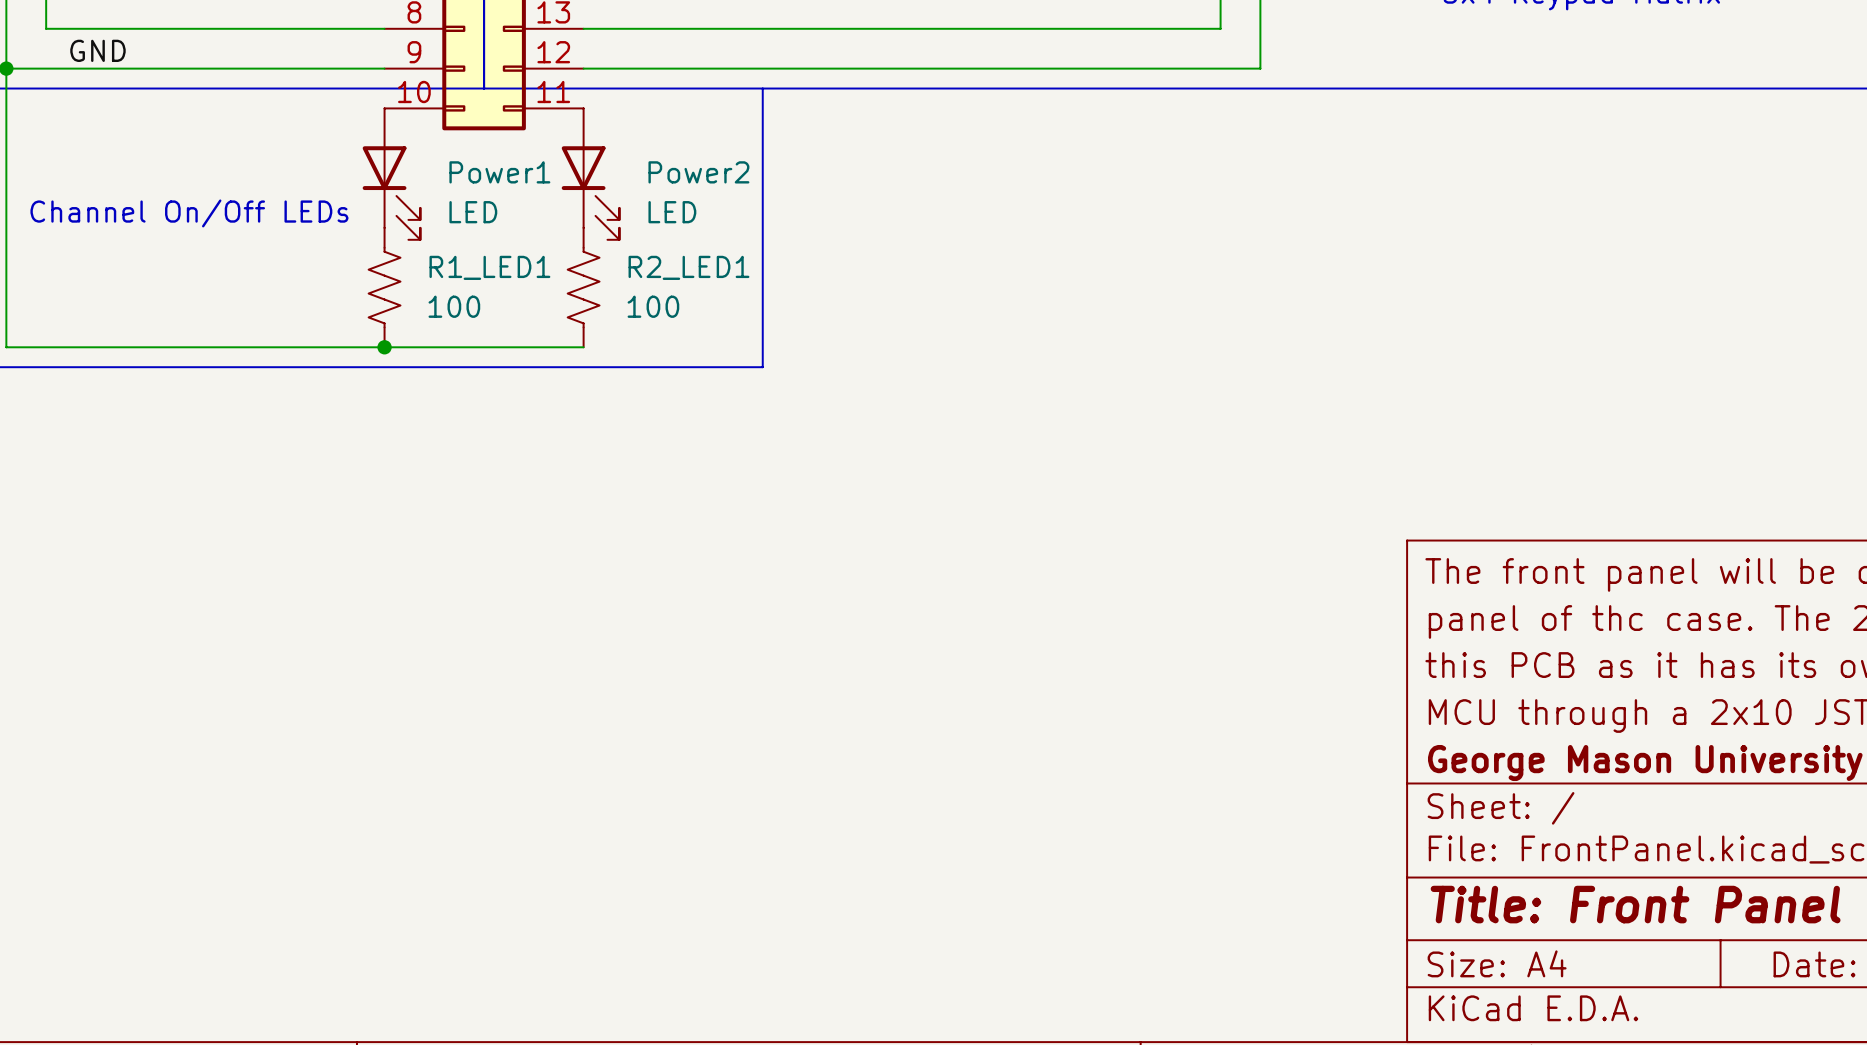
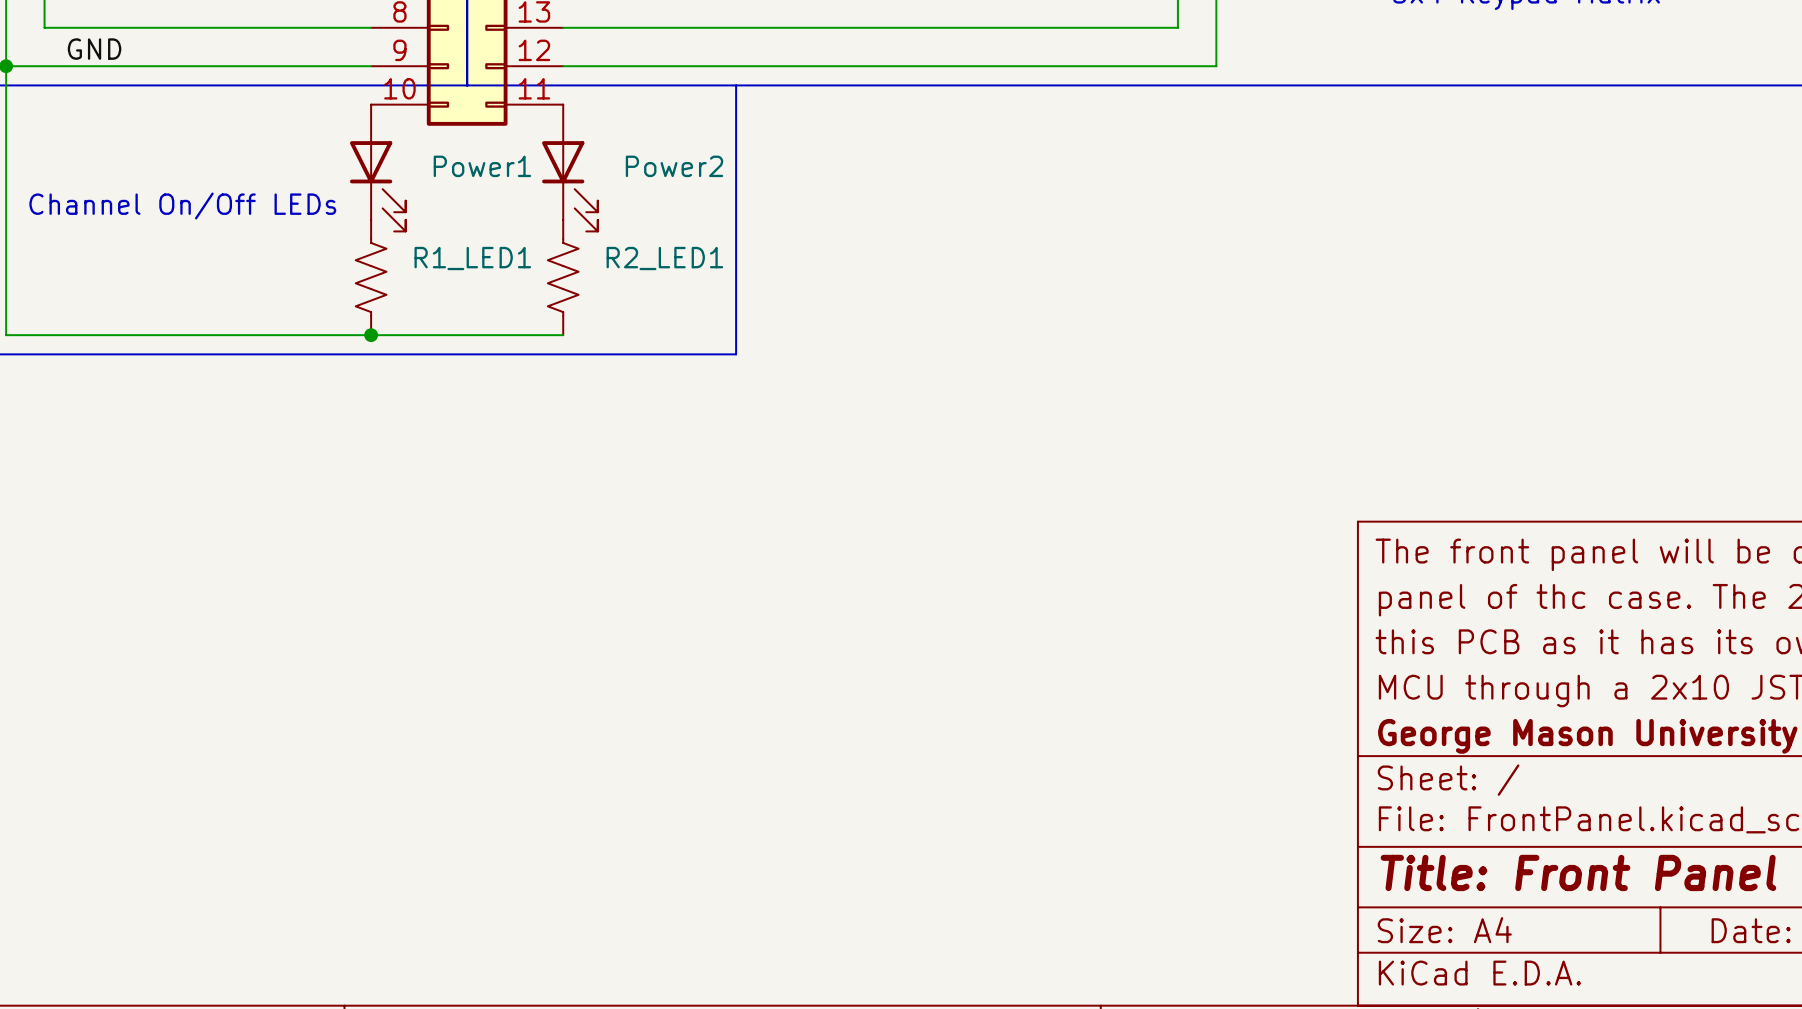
Power1 value: LED (473, 212) -> none
Power2 value: LED (672, 212) -> none
R1_LED1 value: 100 (454, 306) -> none
R2_LED1 value: 100 (653, 306) -> none

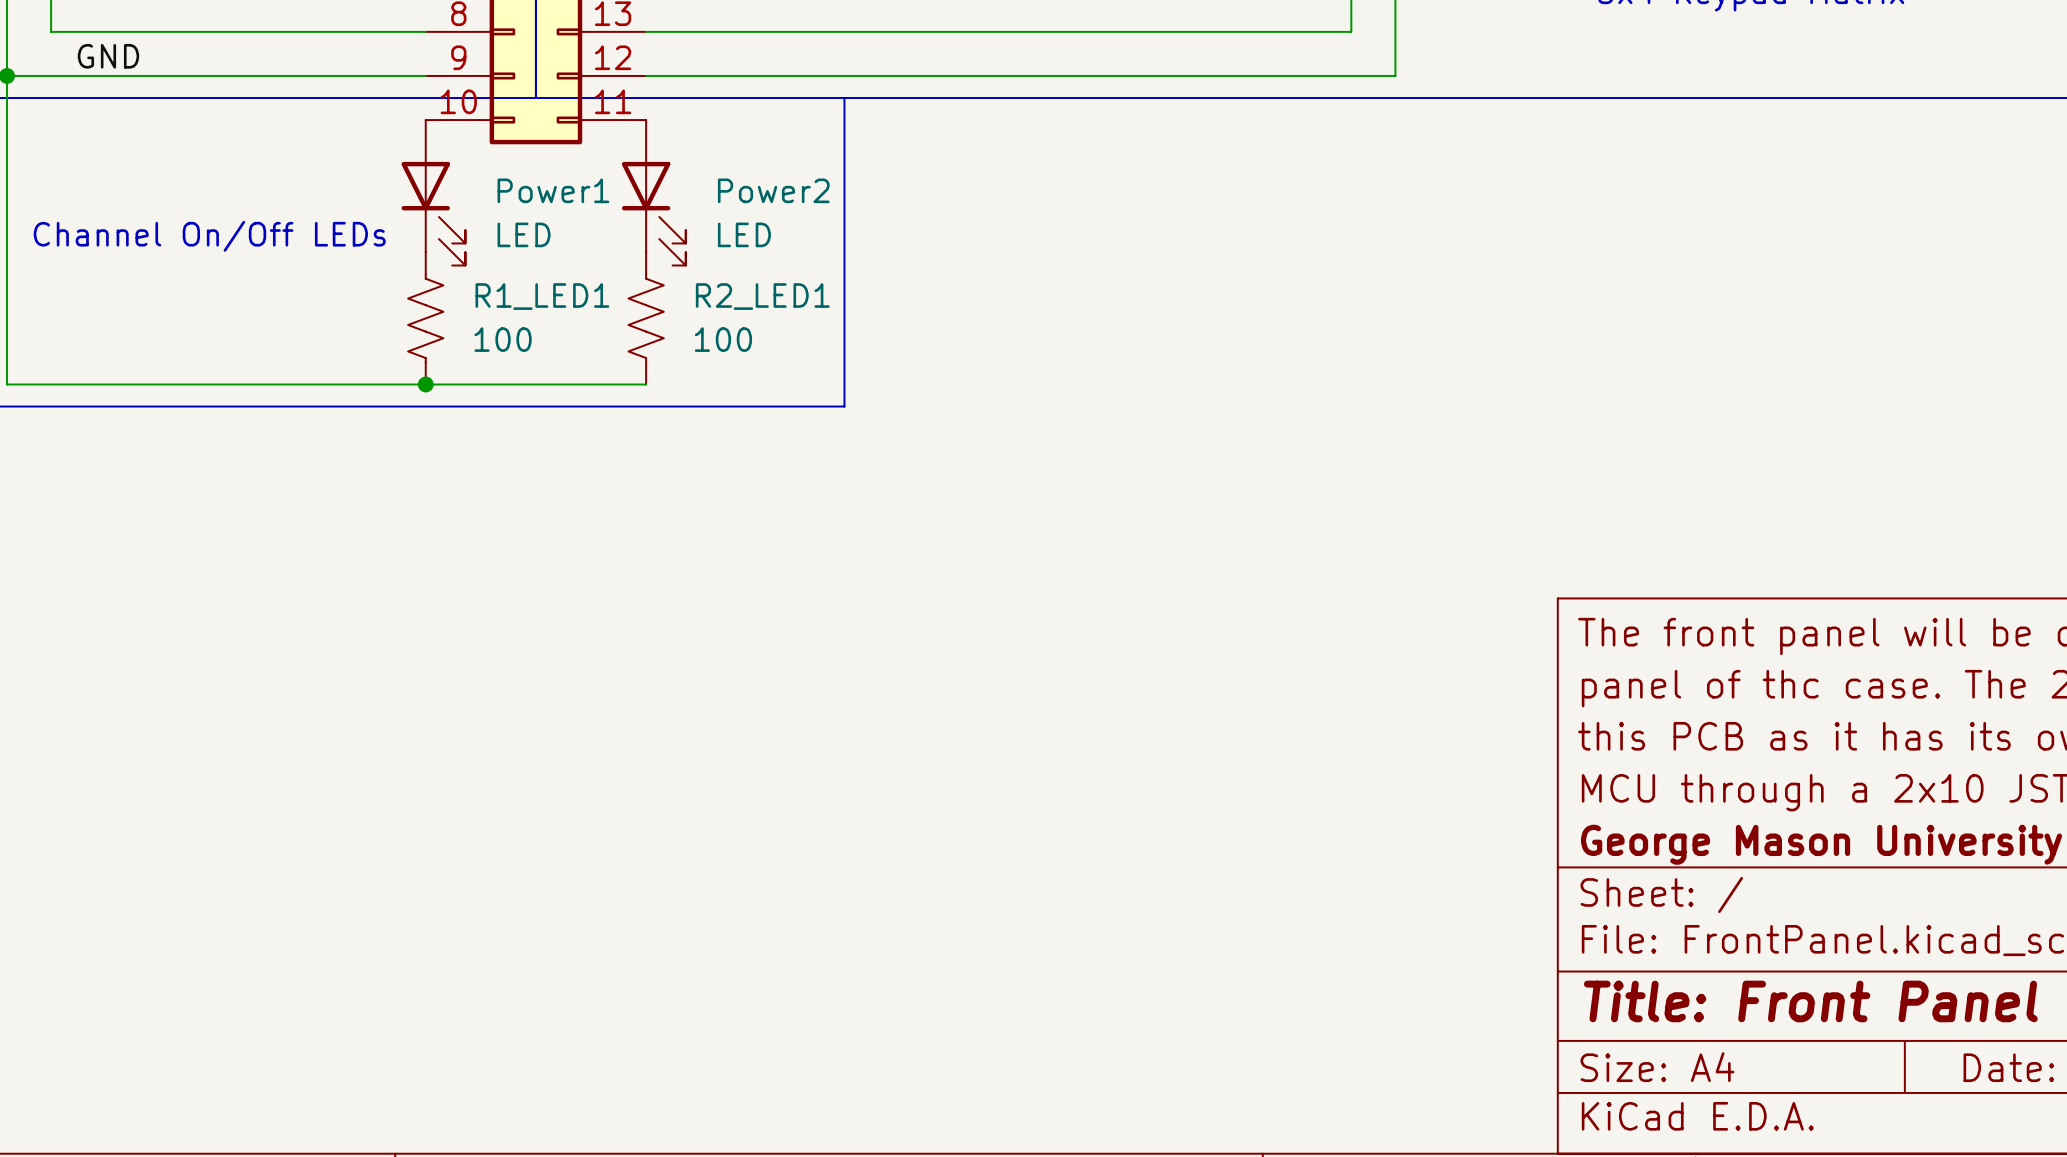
Power1 value: none -> LED (524, 234)
Power2 value: none -> LED (744, 234)
R1_LED1 value: none -> 100 (503, 339)
R2_LED1 value: none -> 100 (723, 339)

